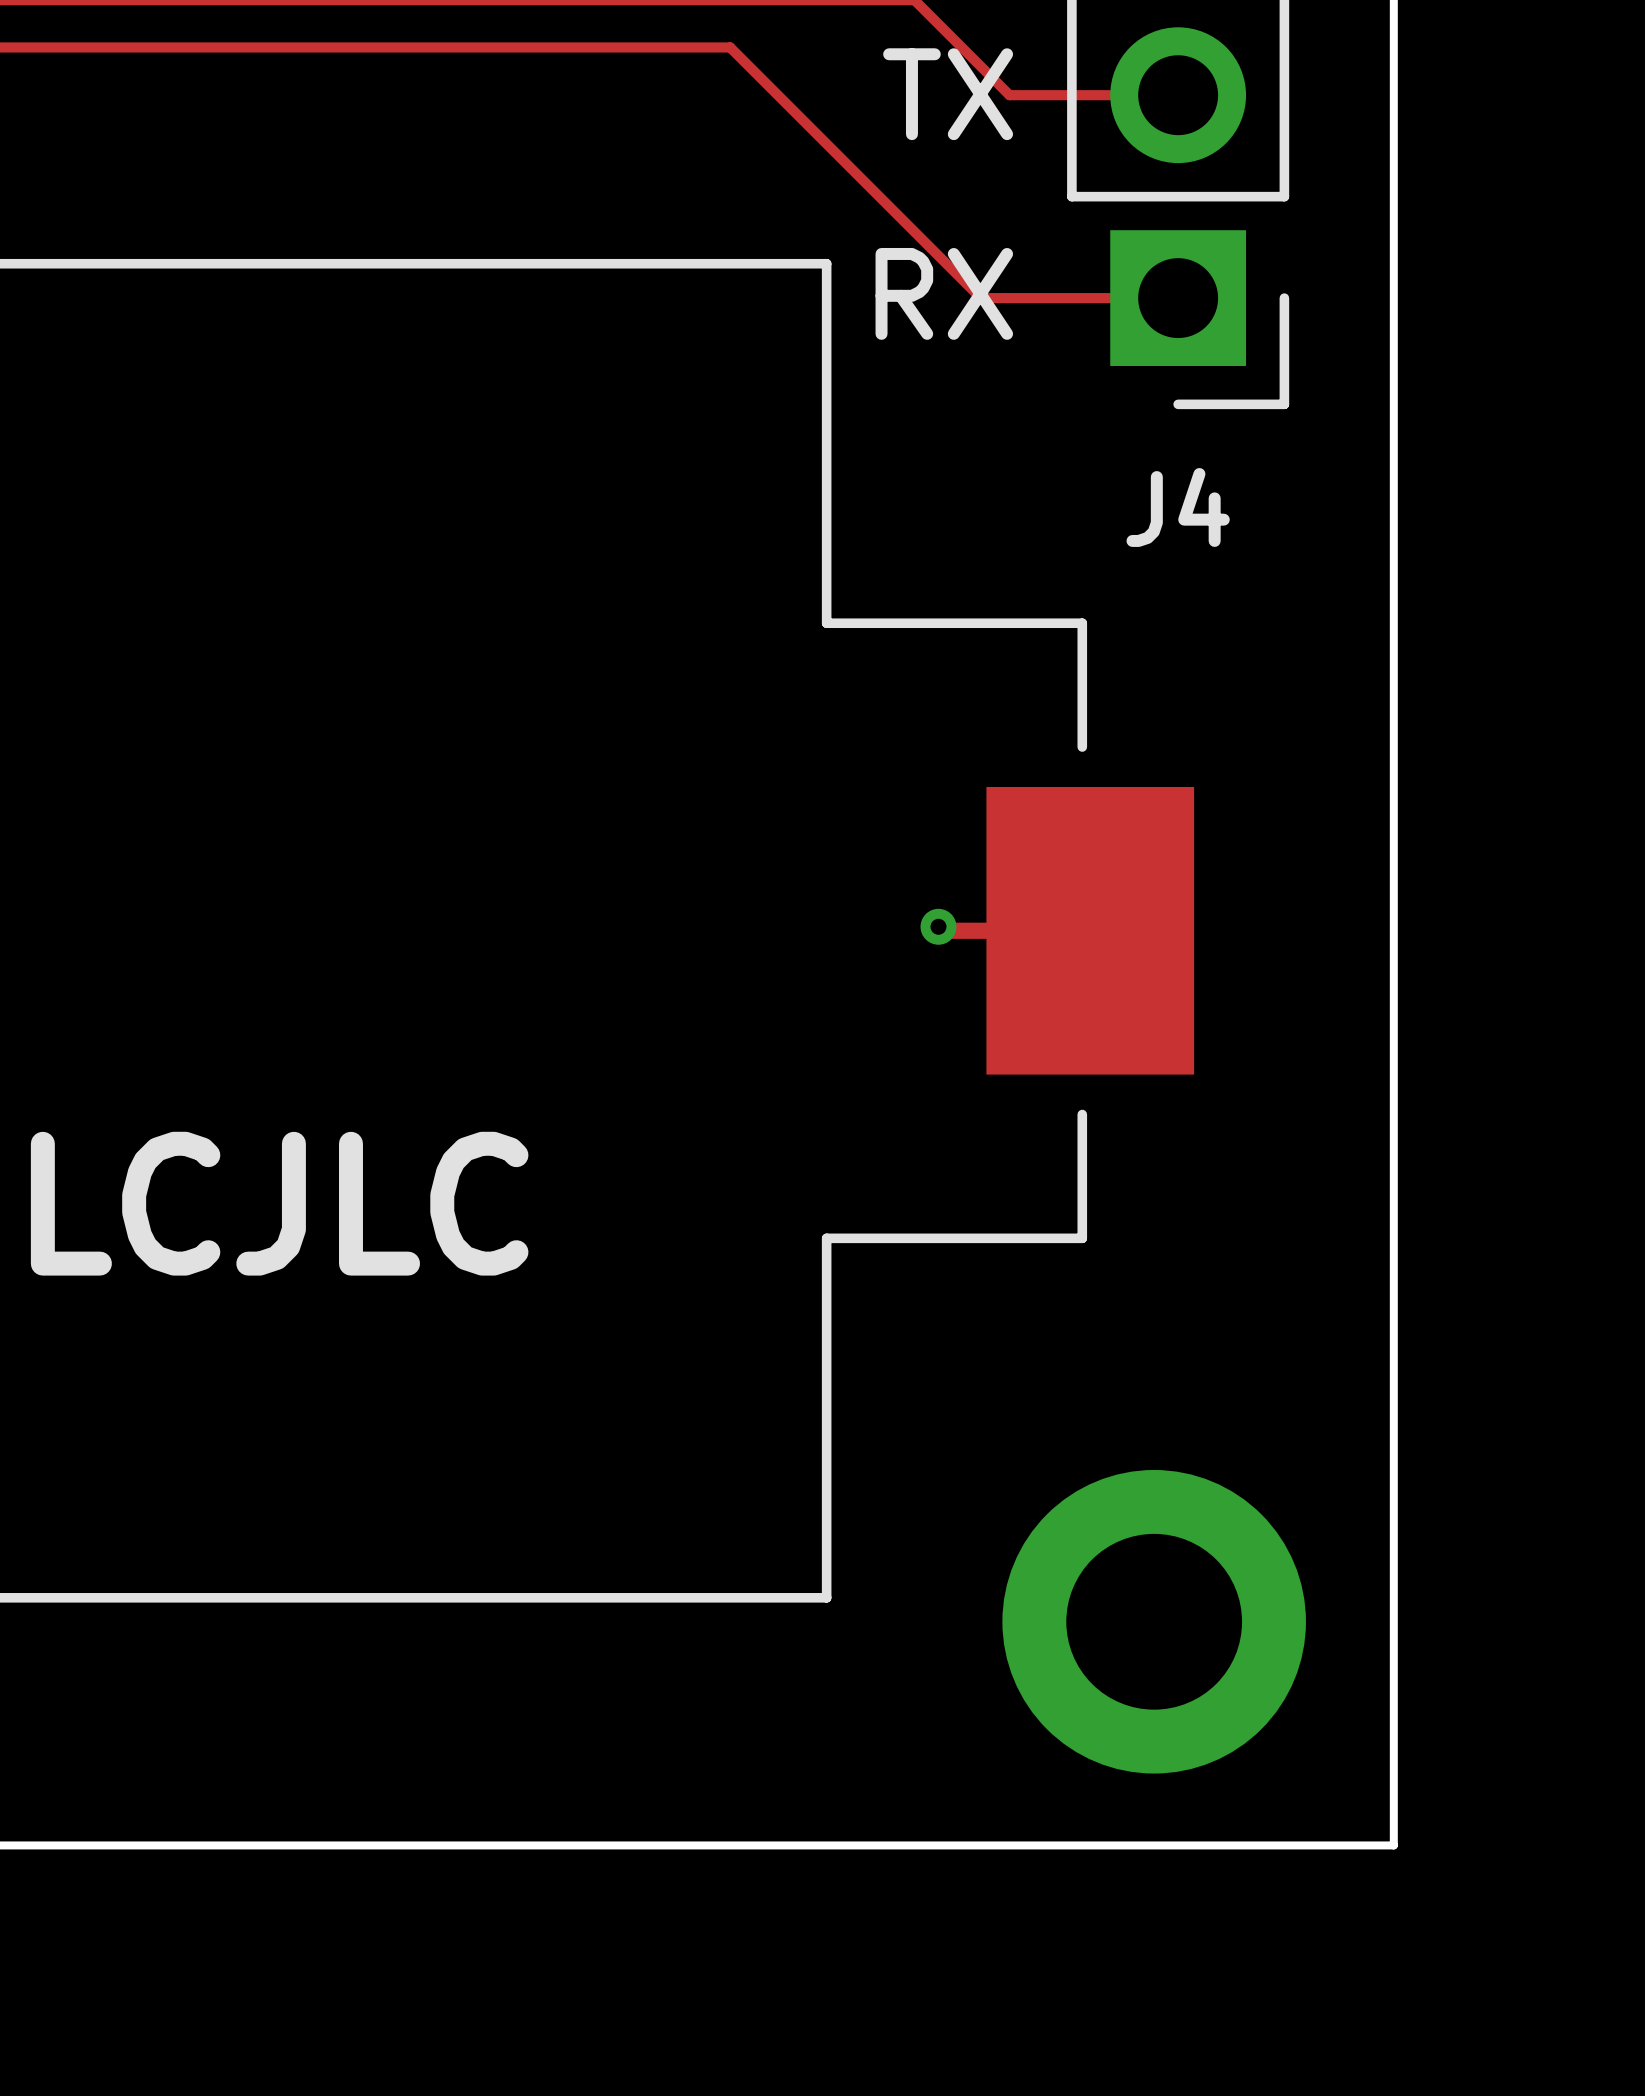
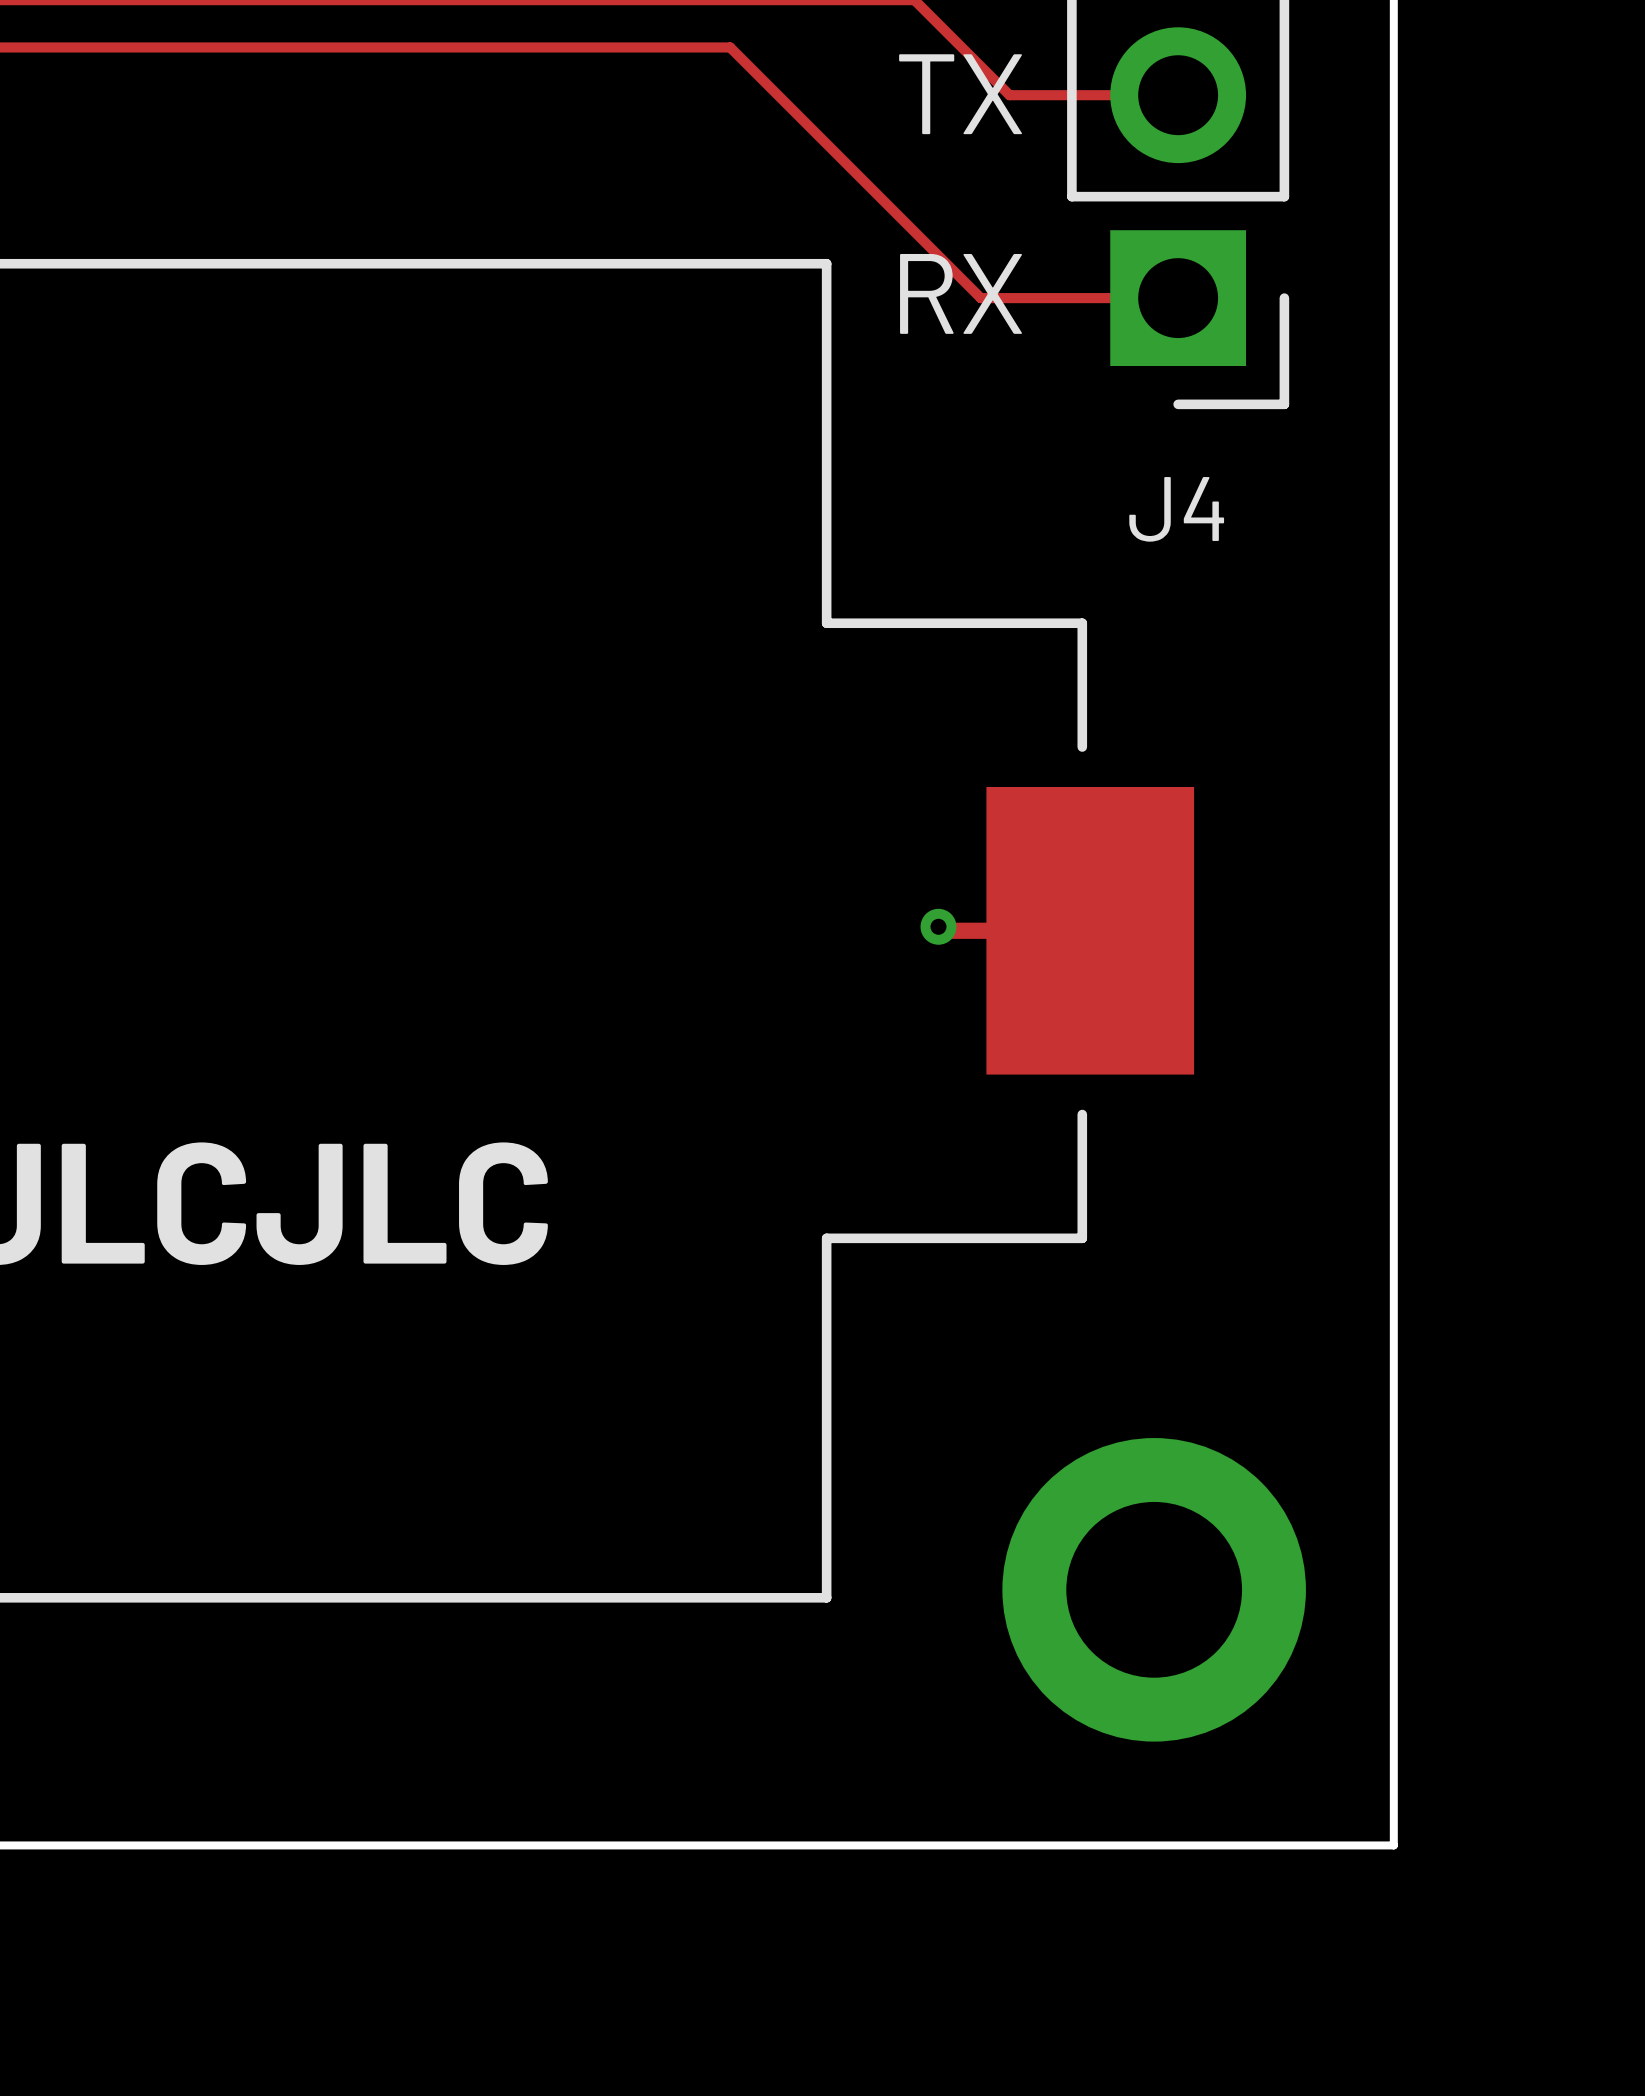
part position: (1154, 1621) -> (1154, 1589)

